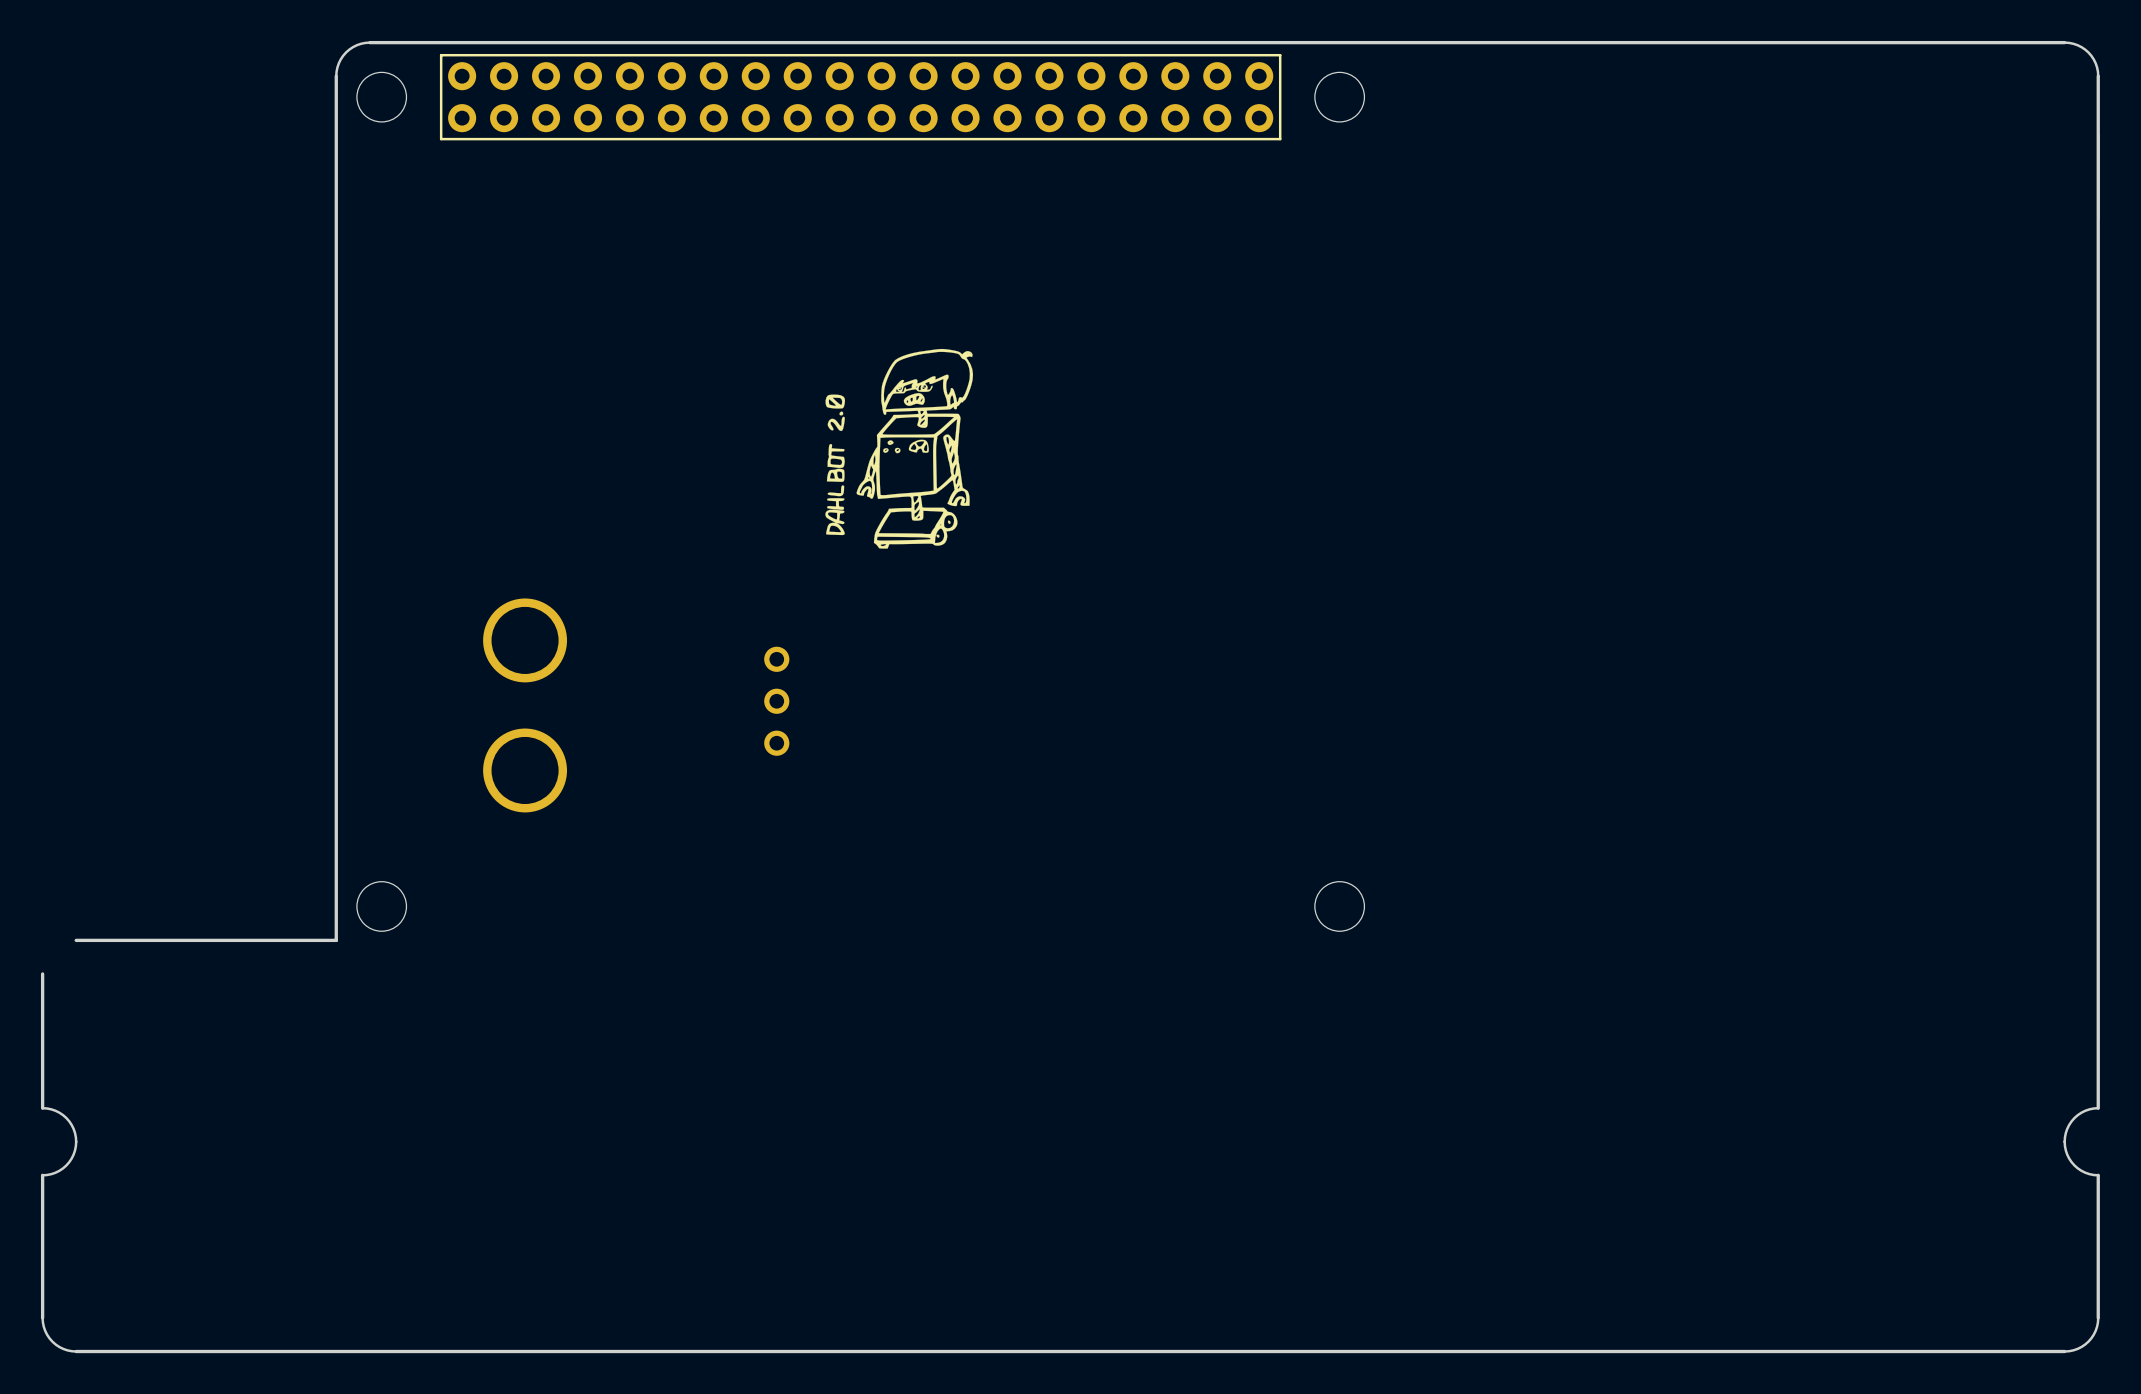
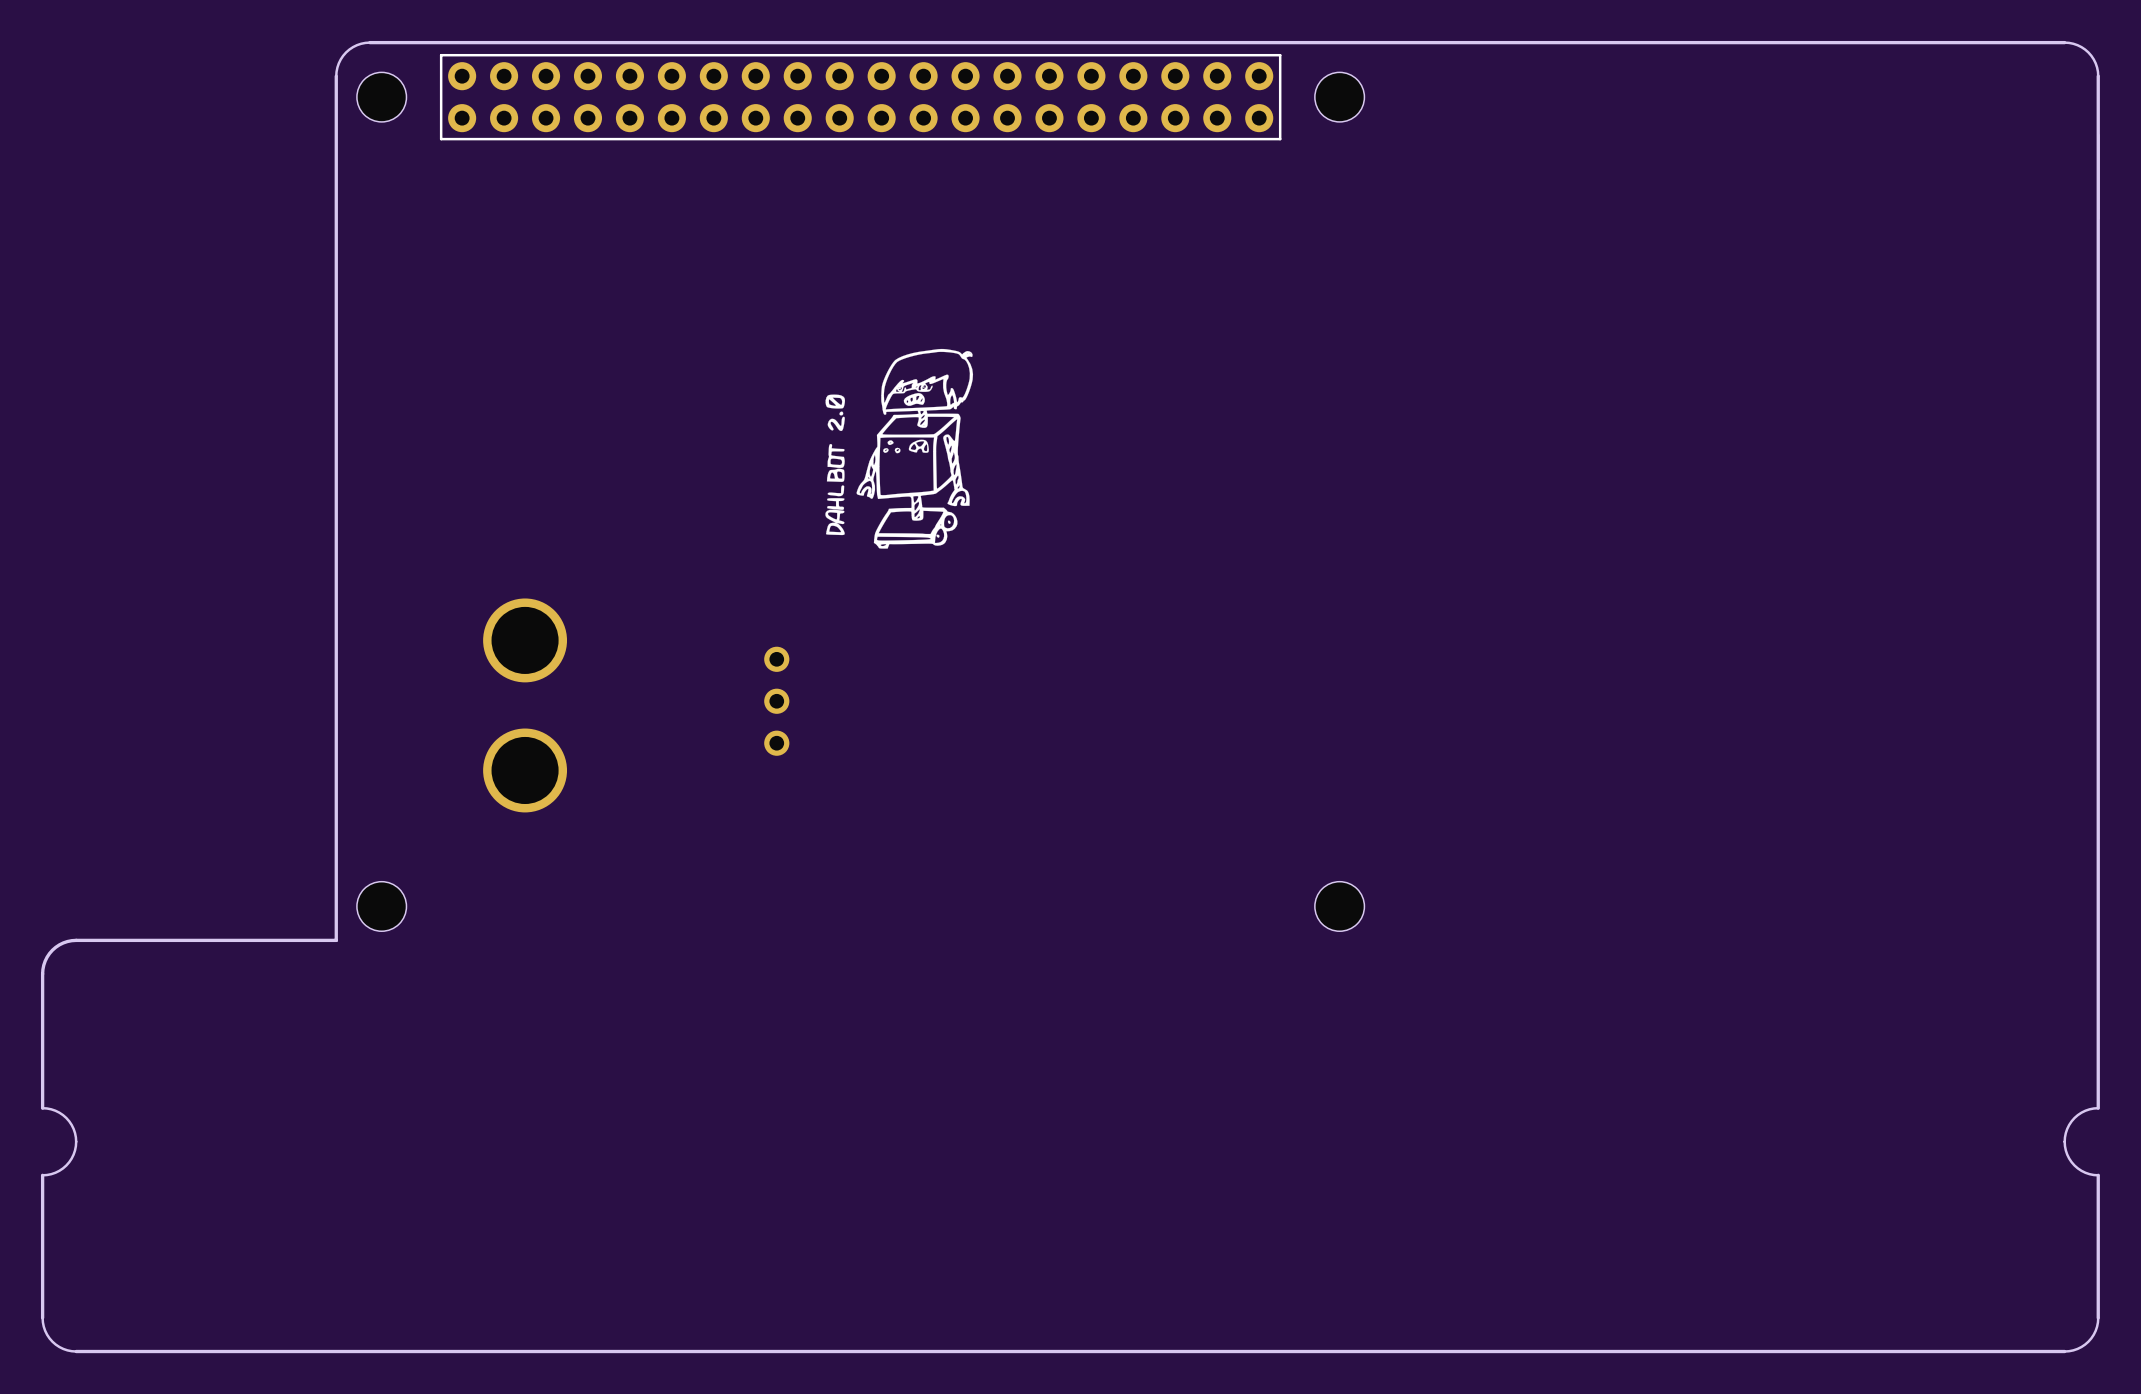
board edge: none -> (76, 940) (63, 942) (52, 950) (45, 961) (42, 973)

